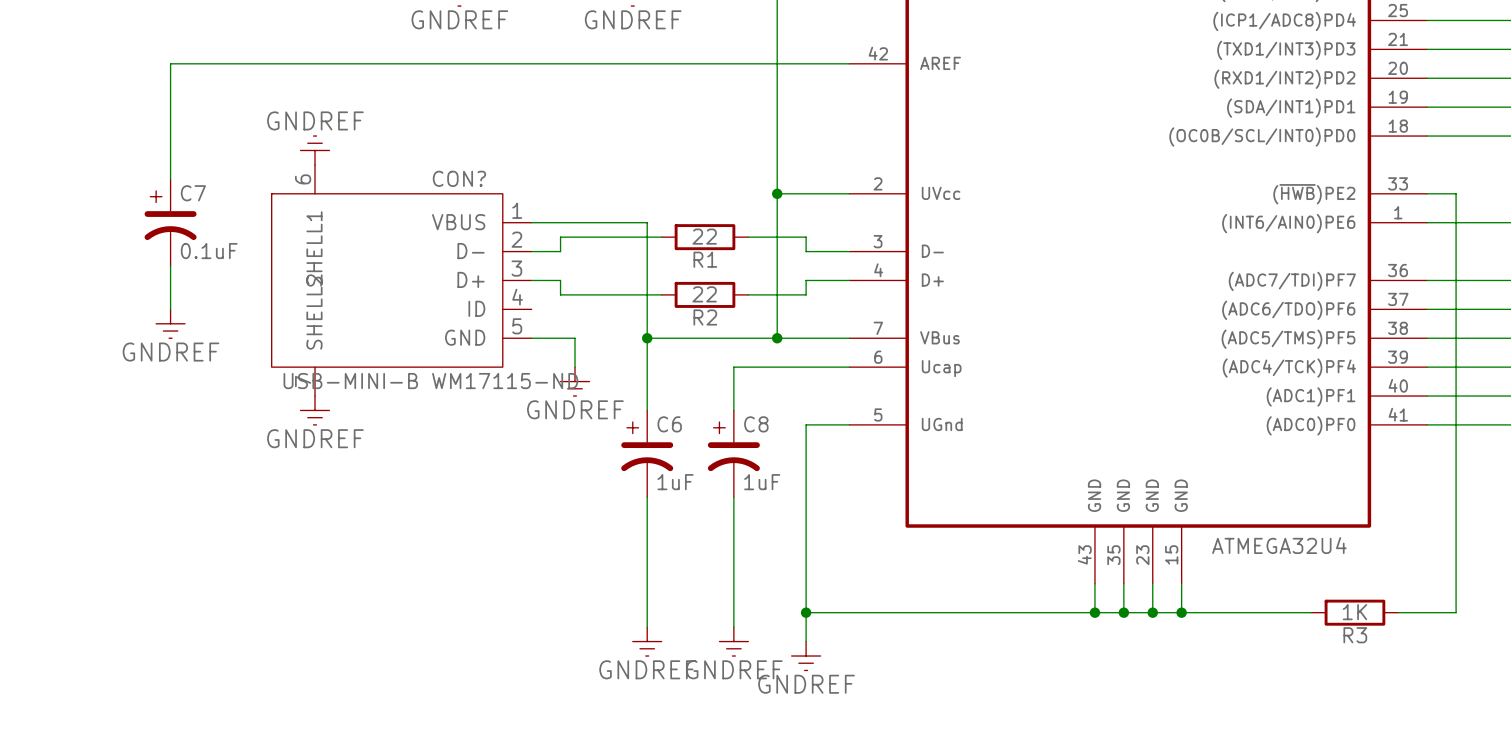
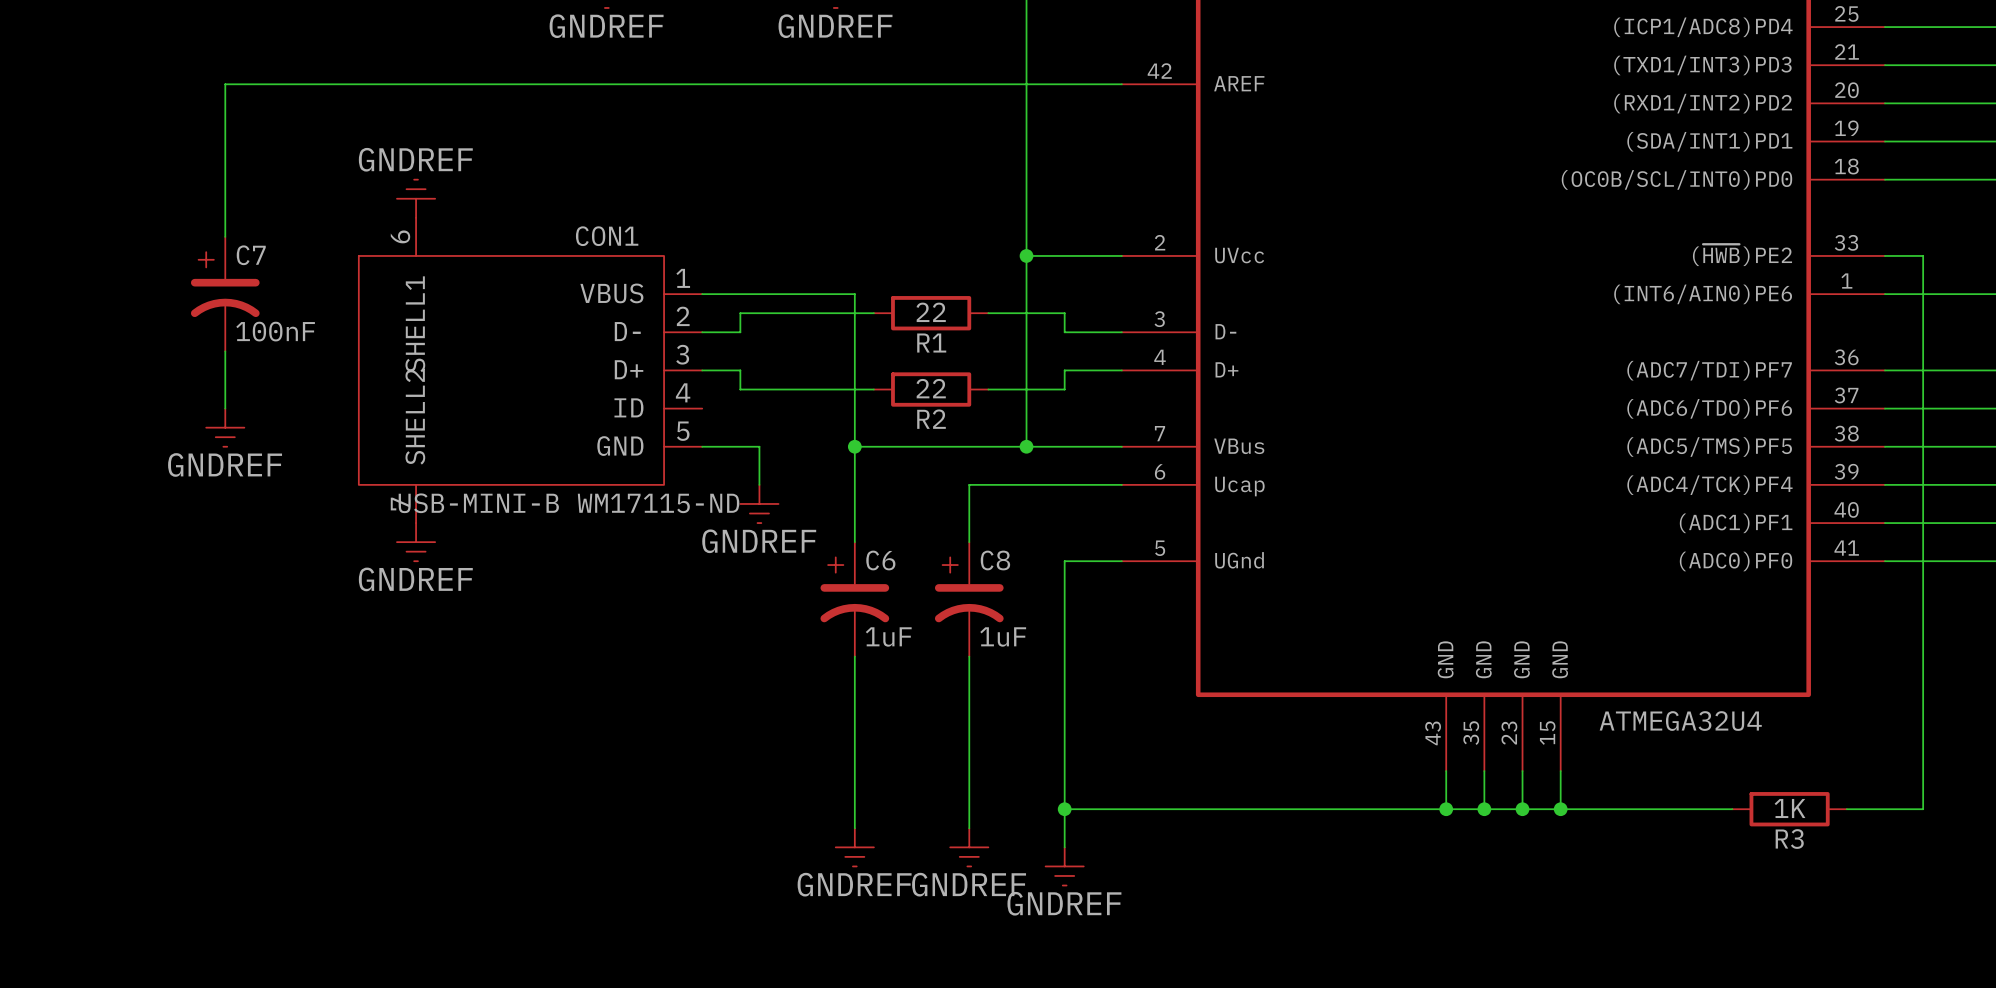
CON? name: CON? (459, 178) -> CON1 (607, 236)
C7 value: 0.1uF (209, 251) -> 100nF (275, 331)

